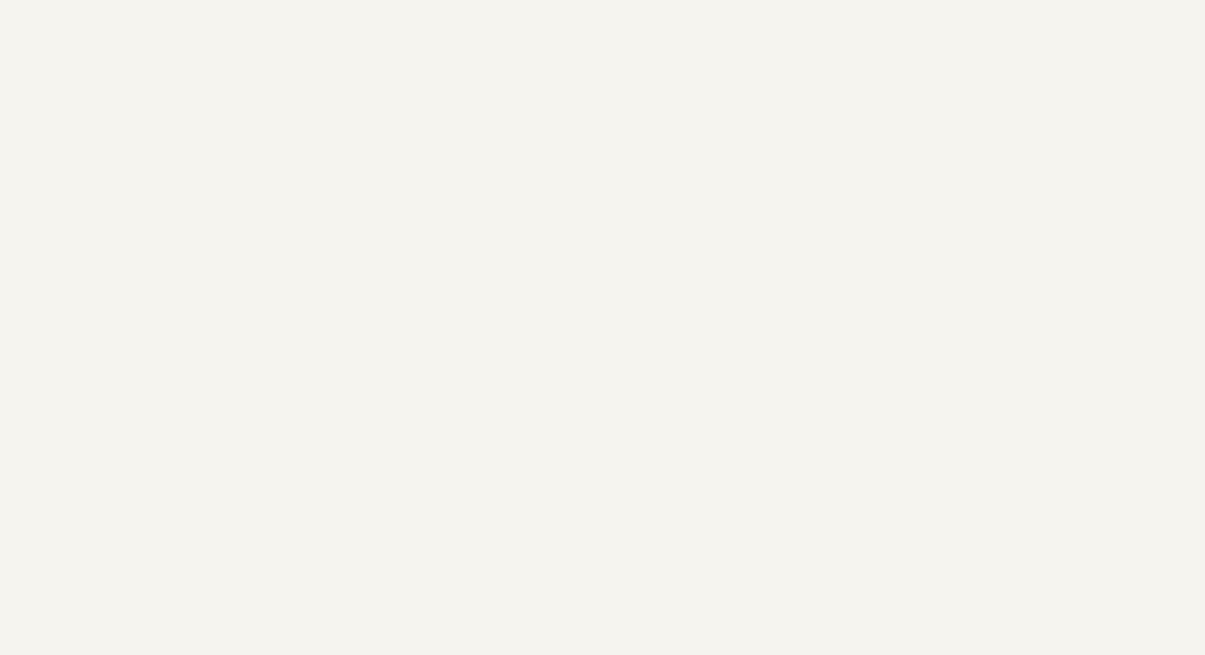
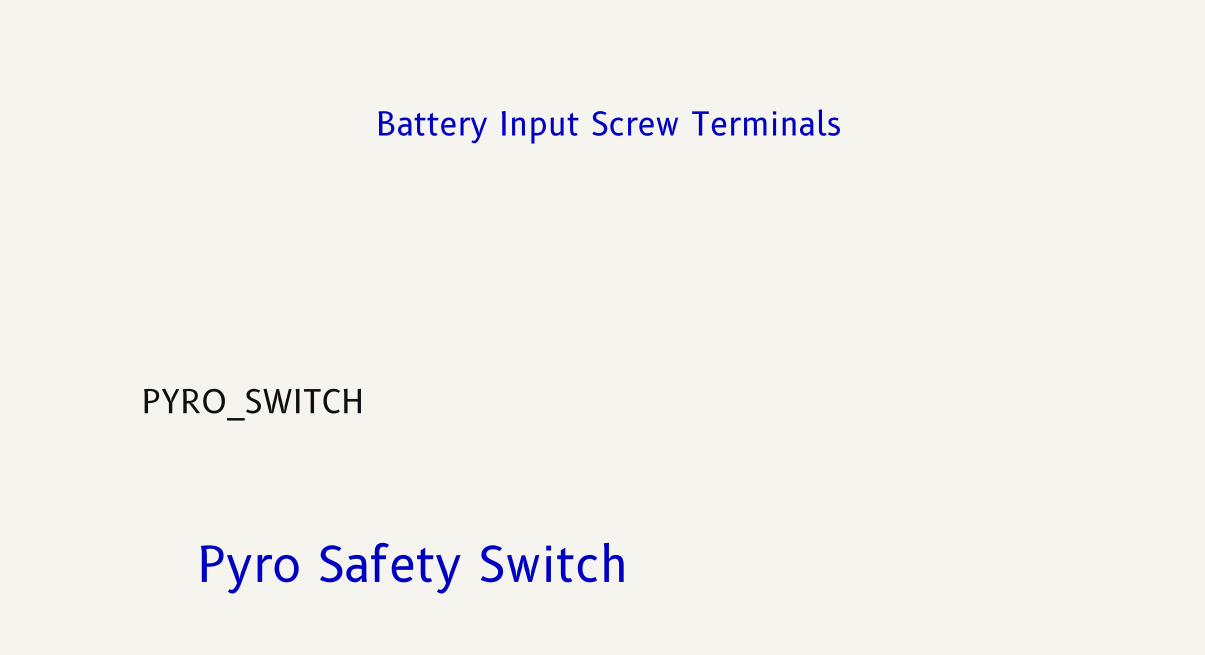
text: none -> Battery Input Screw Terminals (609, 126)
label: none -> PYRO_SWITCH (252, 404)
text: none -> Pyro Safety Switch (412, 568)

